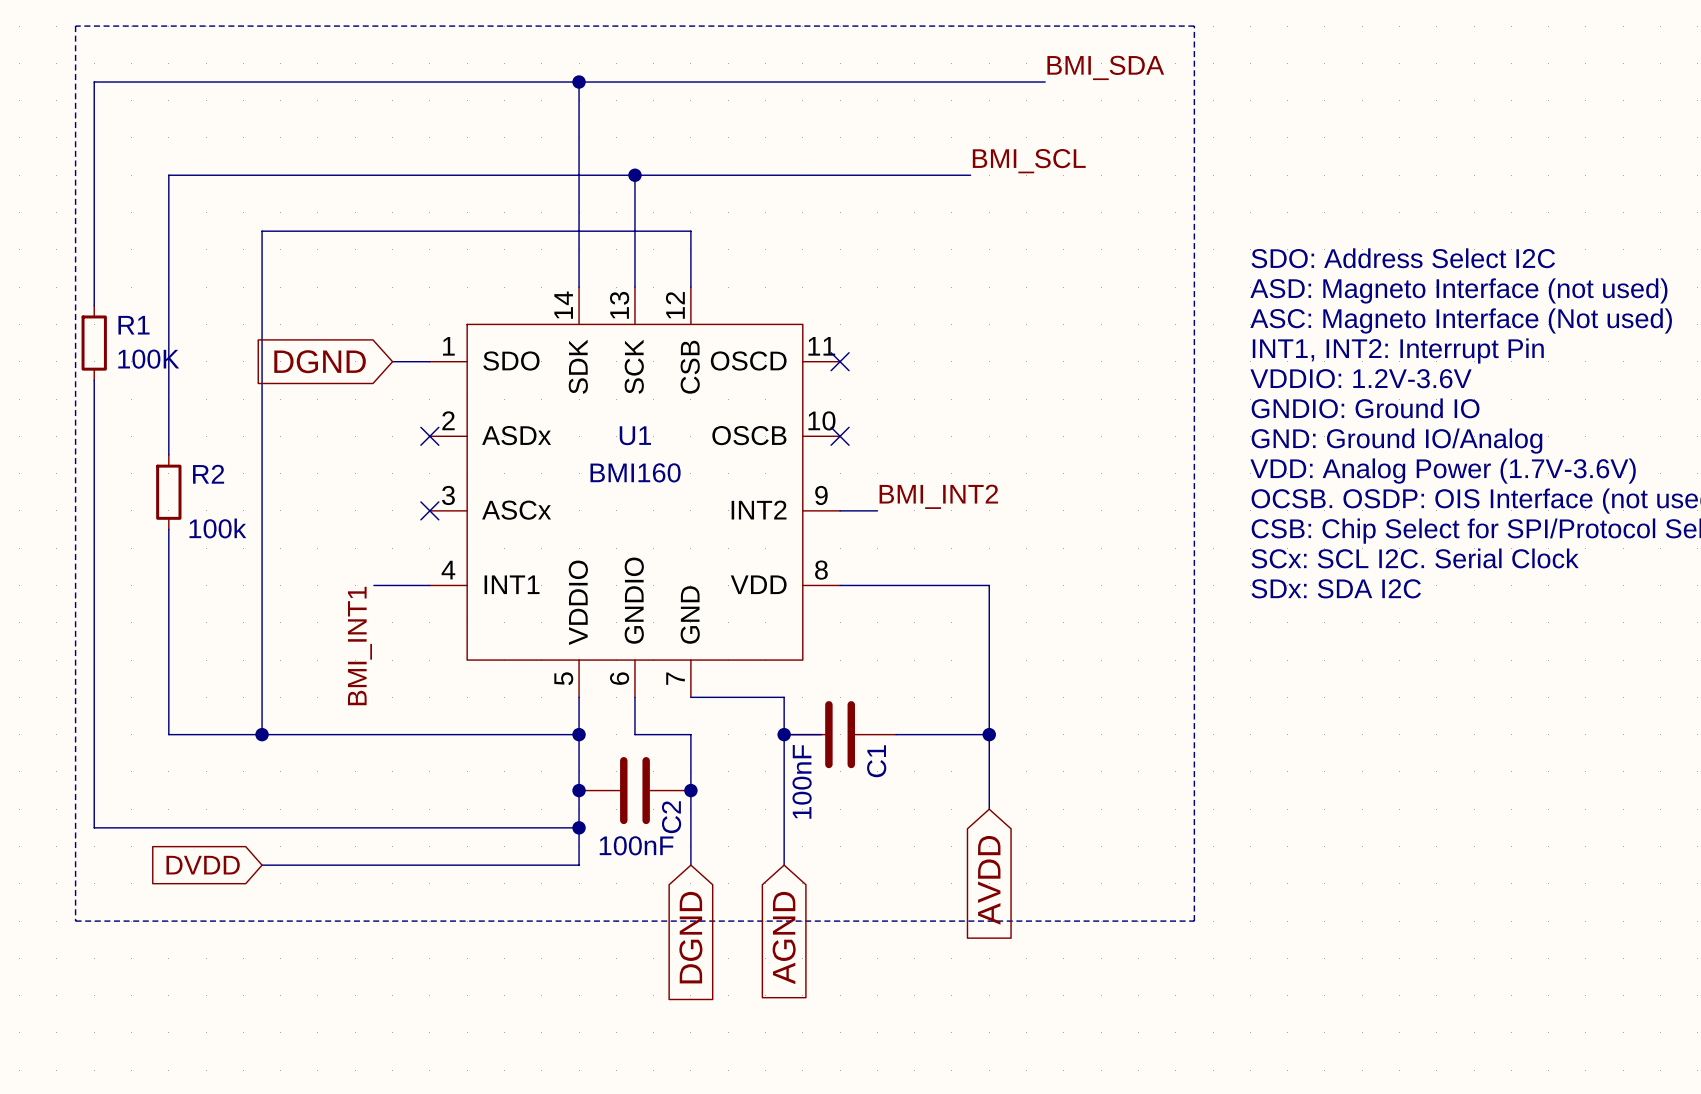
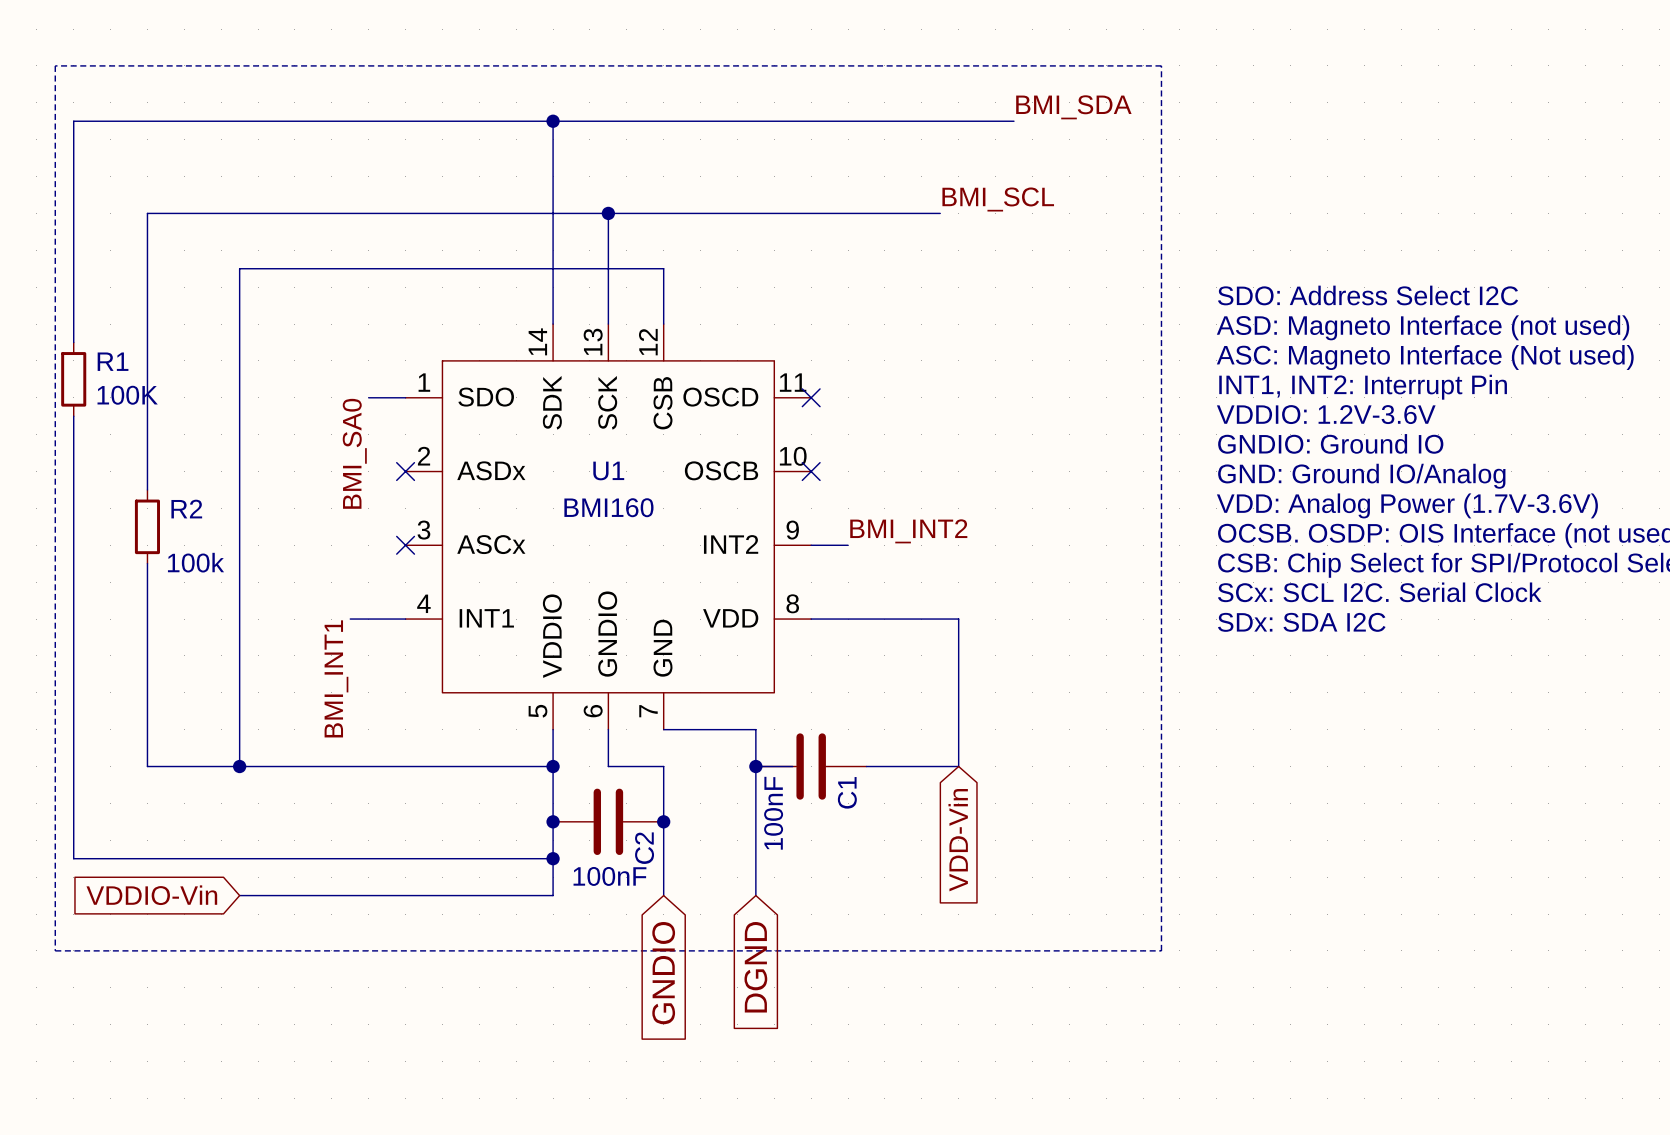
global label: DGND (320, 361) -> none
label: none -> BMI_SA0 (354, 453)
wire: (989, 734) (989, 809) -> none
junction: (989, 734) -> none
global label: none -> VDD-Vin (958, 840)
global label: DVDD (203, 865) -> VDDIO-Vin (151, 895)
global label: AVDD (989, 880) -> none
global label: DGND (690, 937) -> GNDIO (663, 973)
global label: AGND (784, 938) -> DGND (755, 967)

